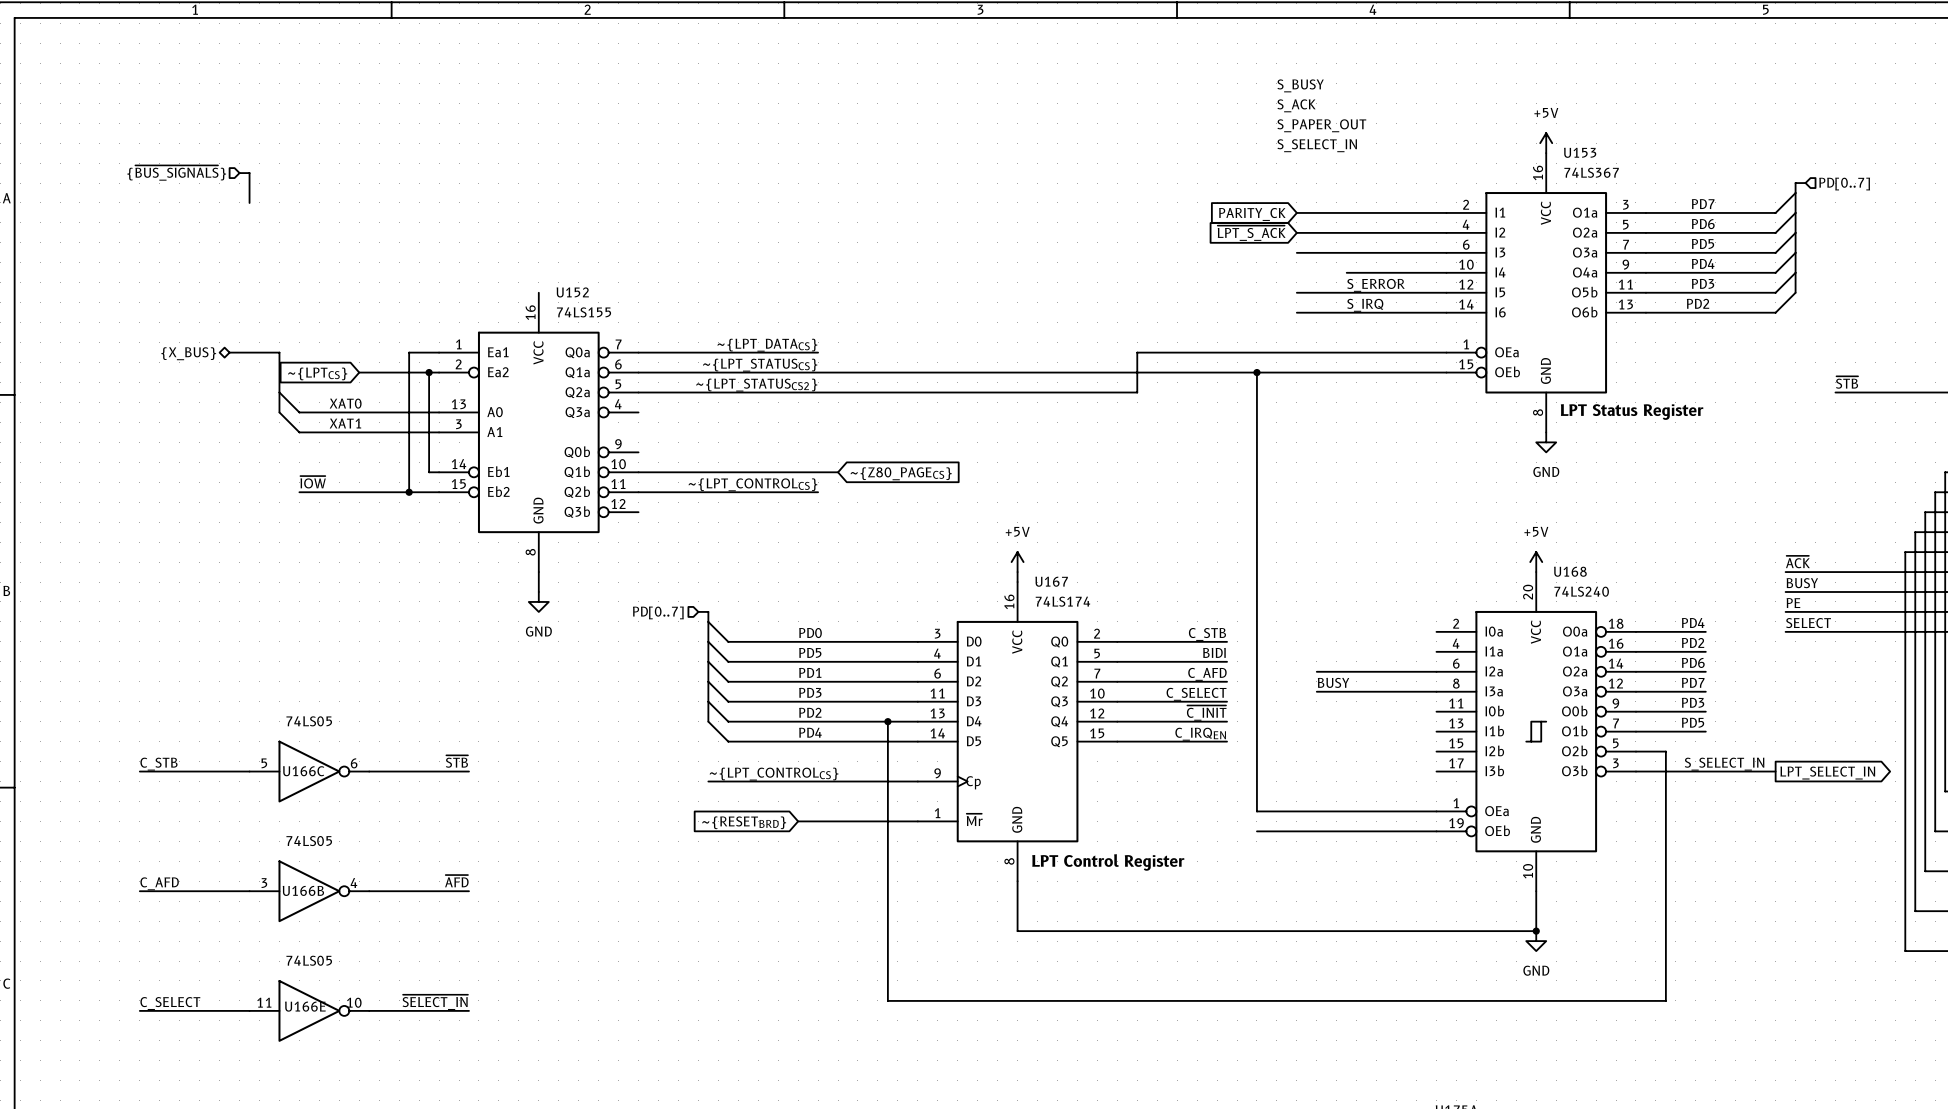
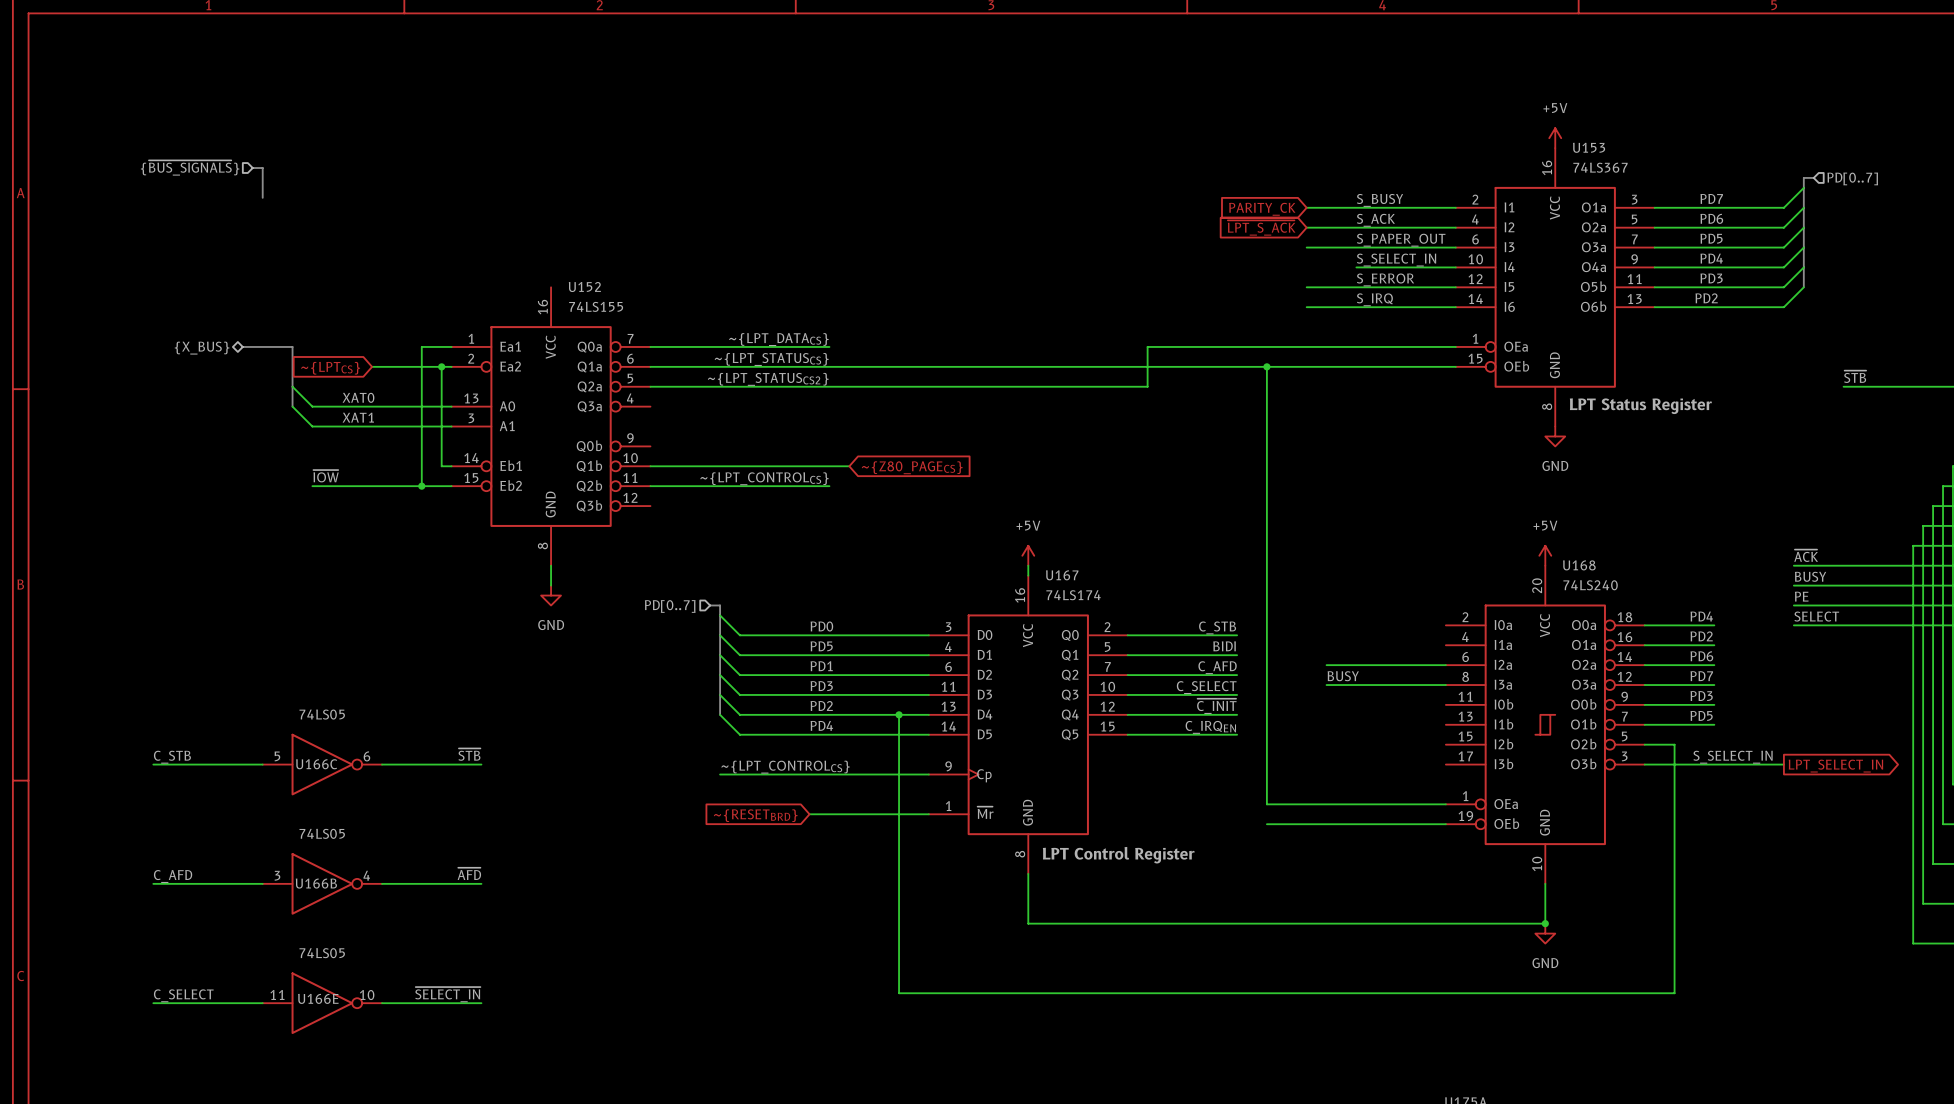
label position: S_BUSY (1300, 85) -> S_BUSY (1380, 200)
label position: S_ACK (1296, 105) -> S_ACK (1375, 220)
label position: S_PAPER_OUT (1321, 125) -> S_PAPER_OUT (1401, 240)
label position: S_SELECT_IN (1317, 145) -> S_SELECT_IN (1396, 260)

